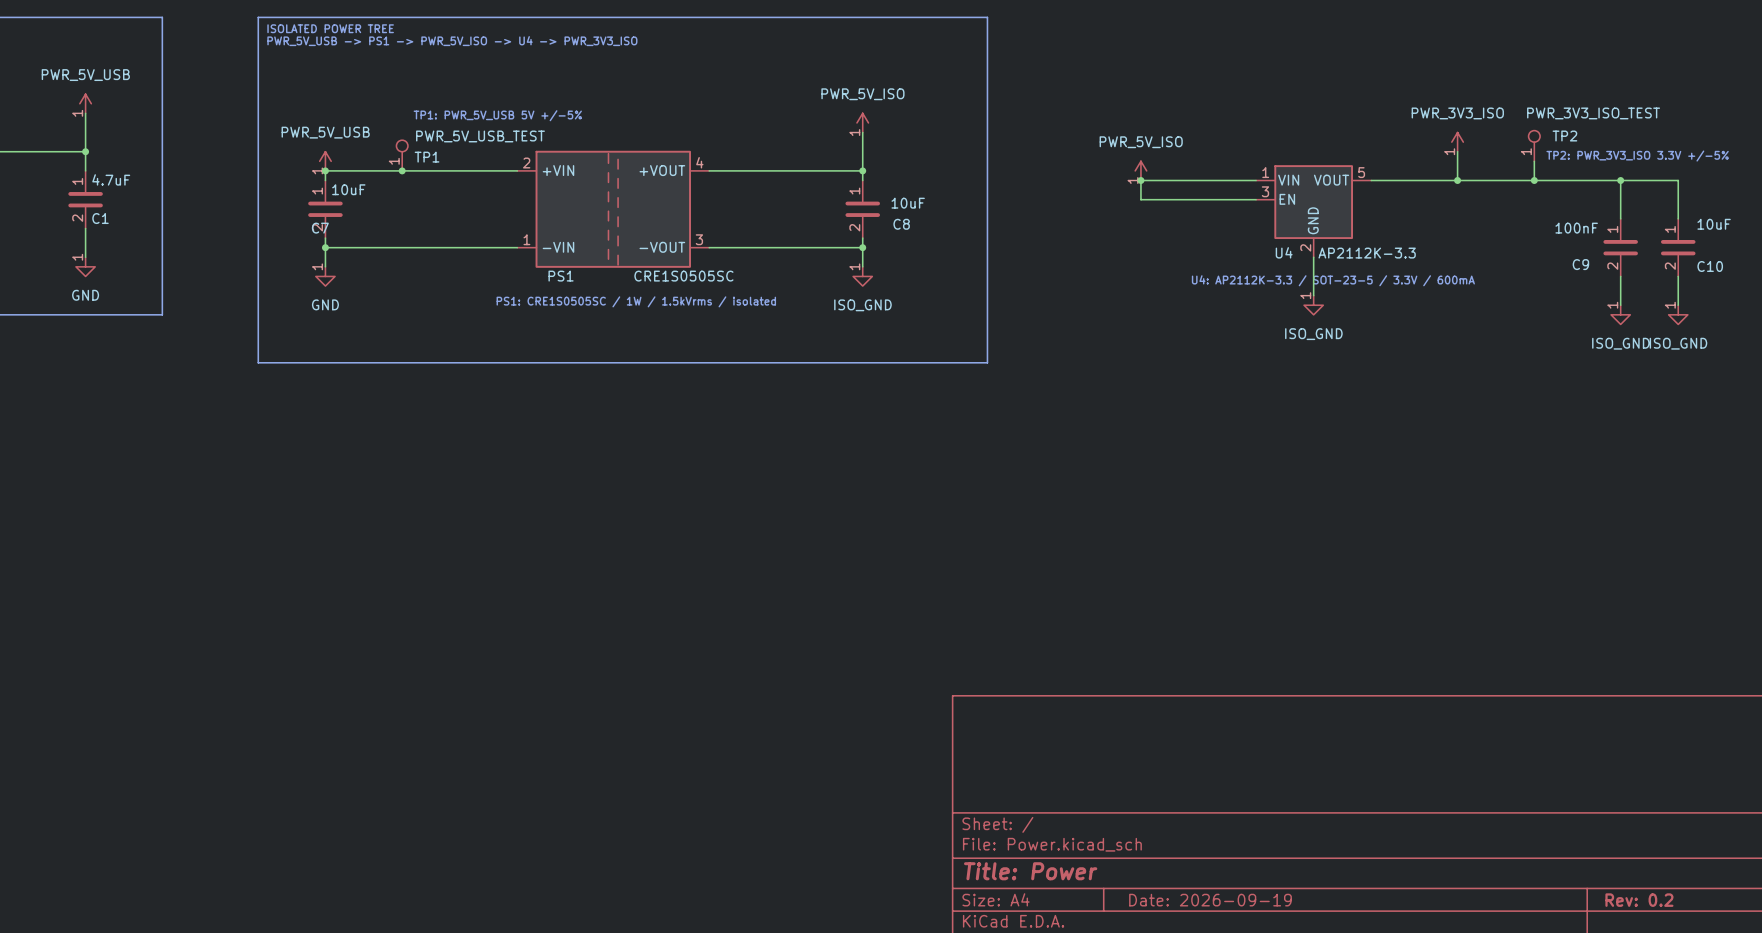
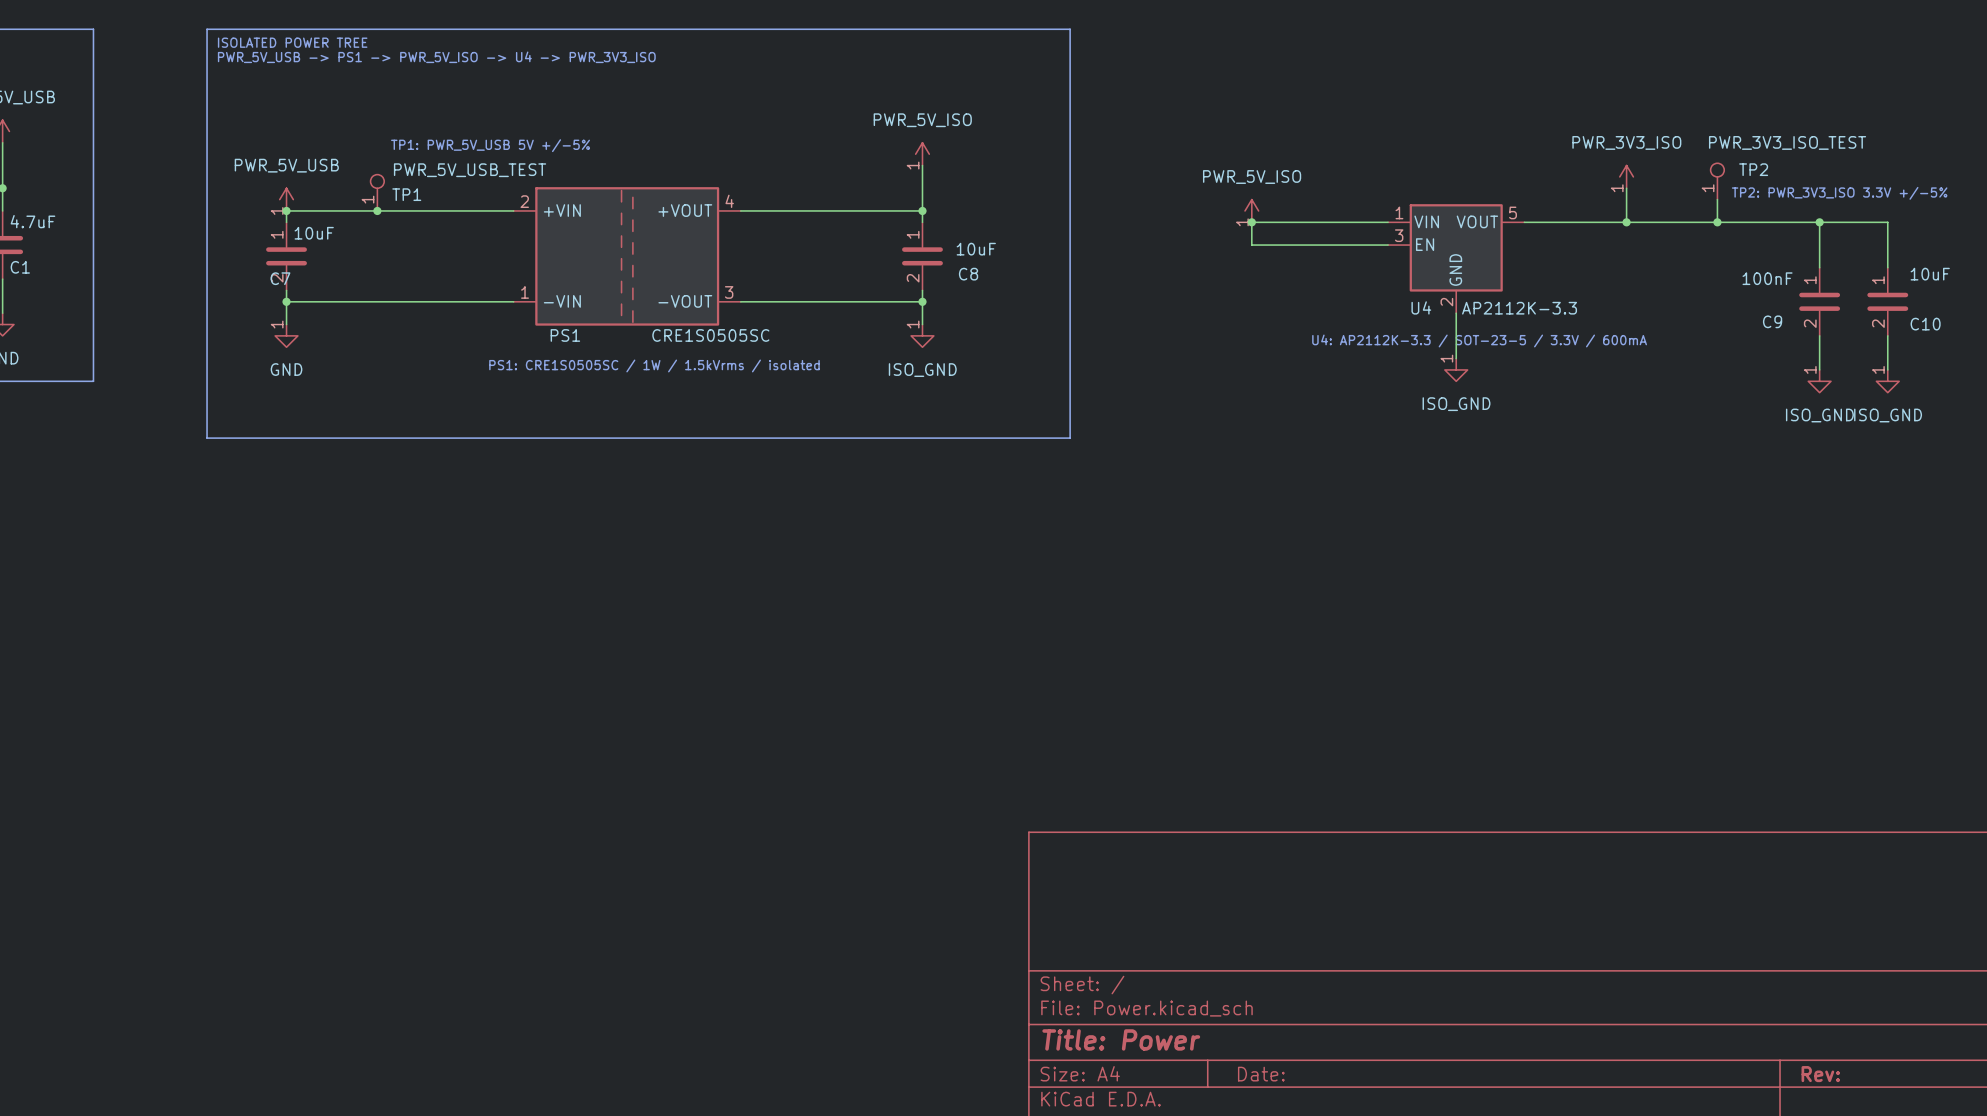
title block: Date: 2026-09-19 (1210, 900) -> Date: (1261, 1074)
title block: Rev: 0.2 (1639, 900) -> Rev: (1820, 1074)

